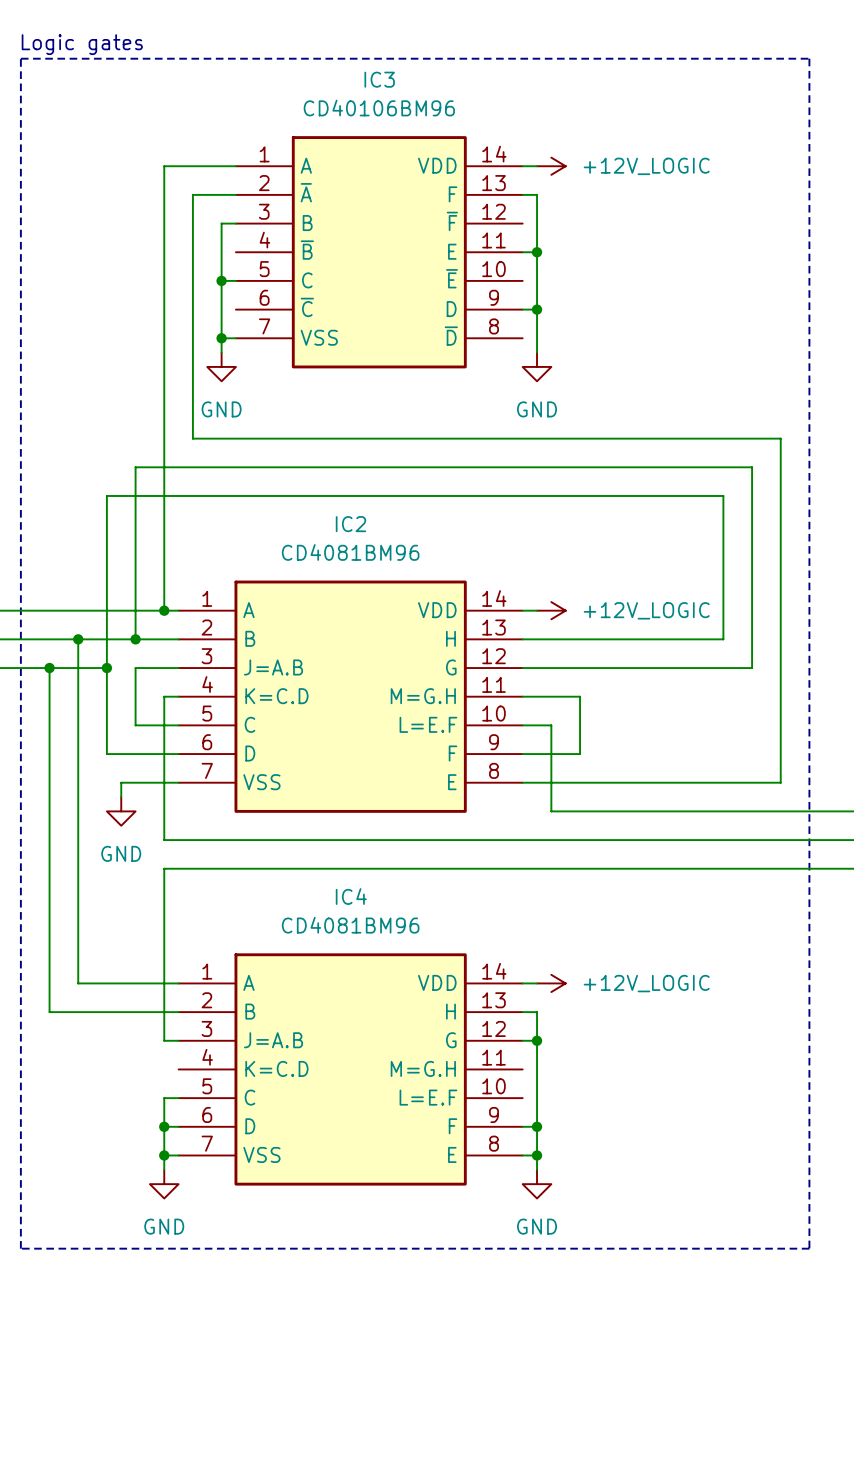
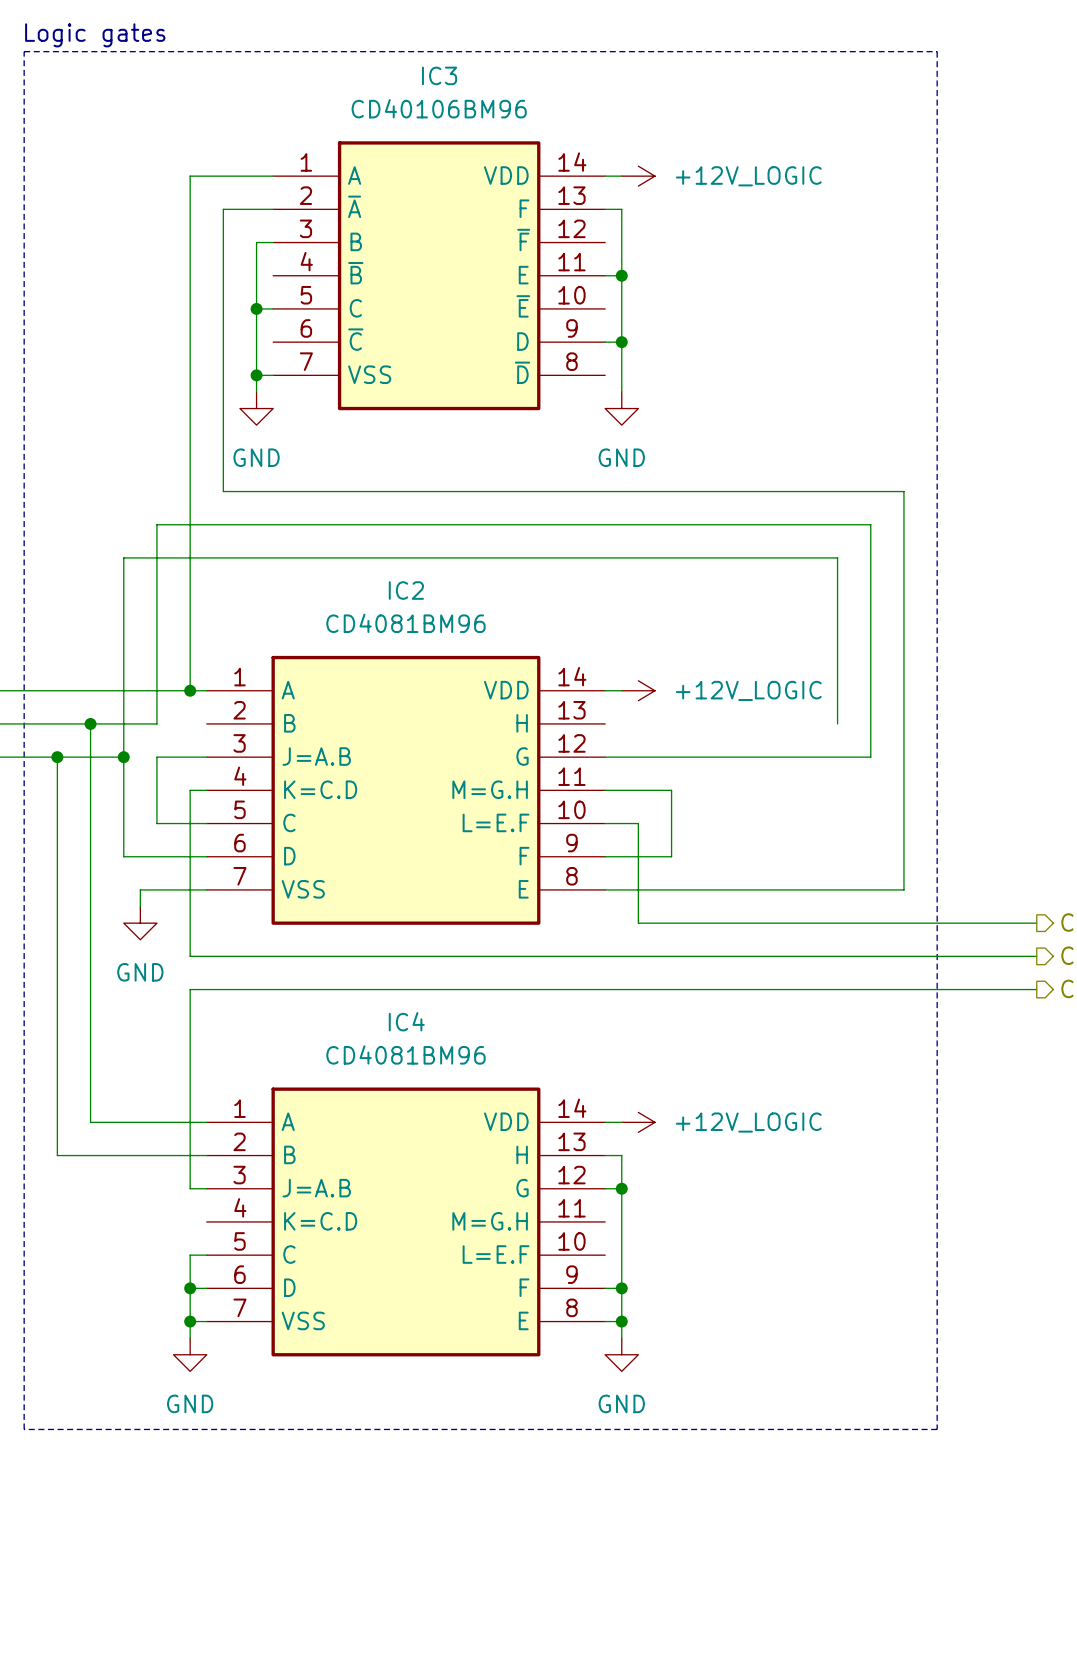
wire: (135, 639) (178, 639) -> none
junction: (135, 639) -> none
wire: (522, 639) (723, 639) -> none

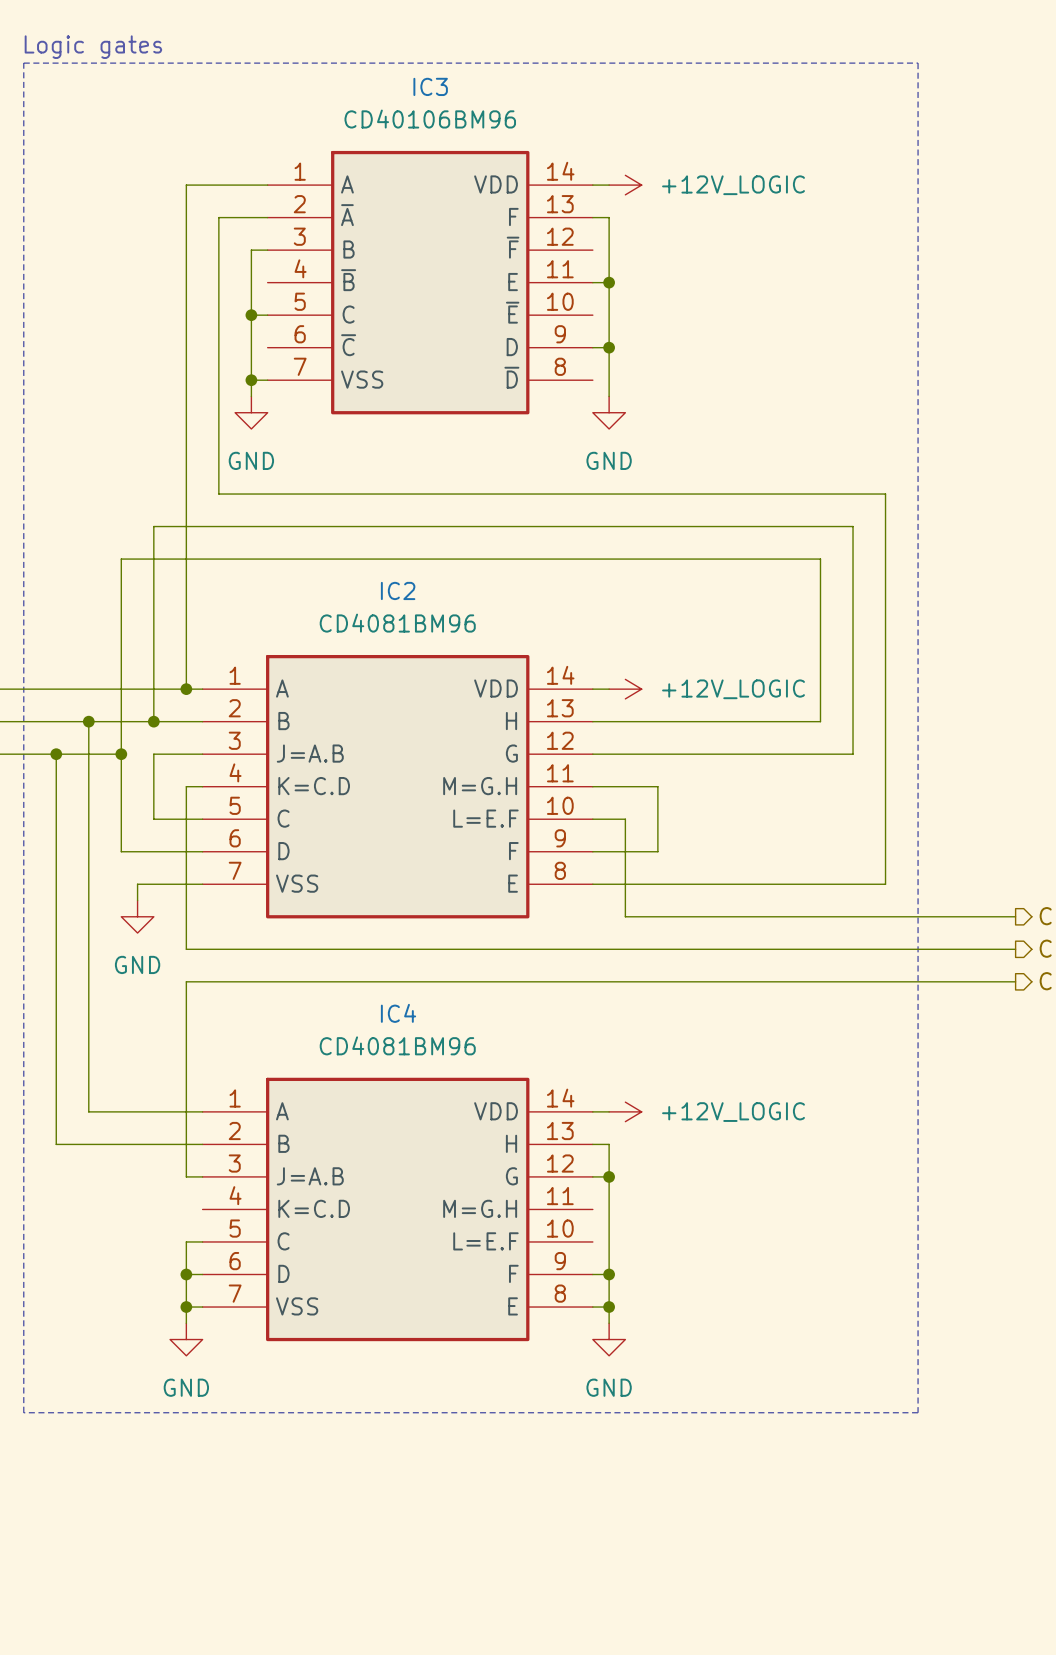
wire: none -> (153, 721) (202, 721)
junction: none -> (153, 721)
wire: none -> (592, 721) (820, 721)

